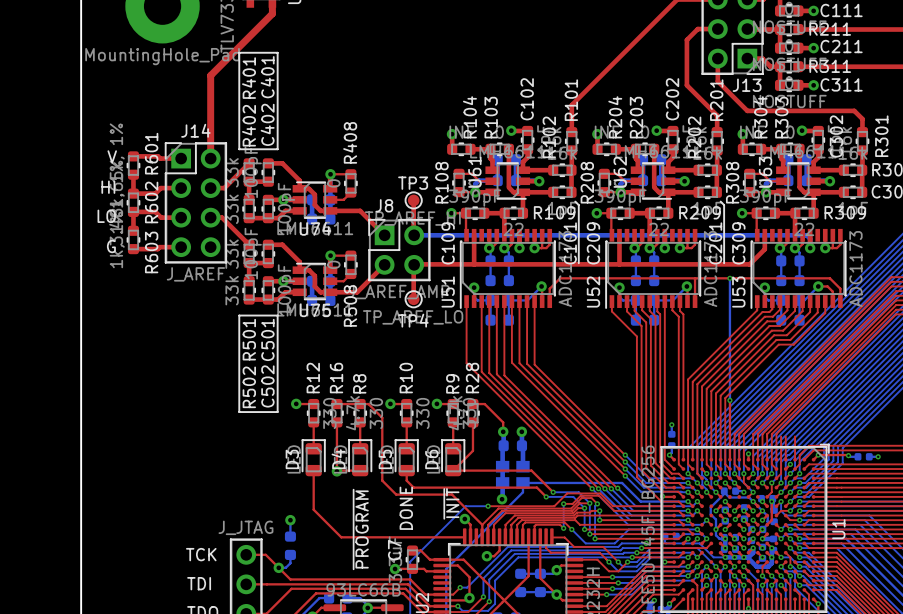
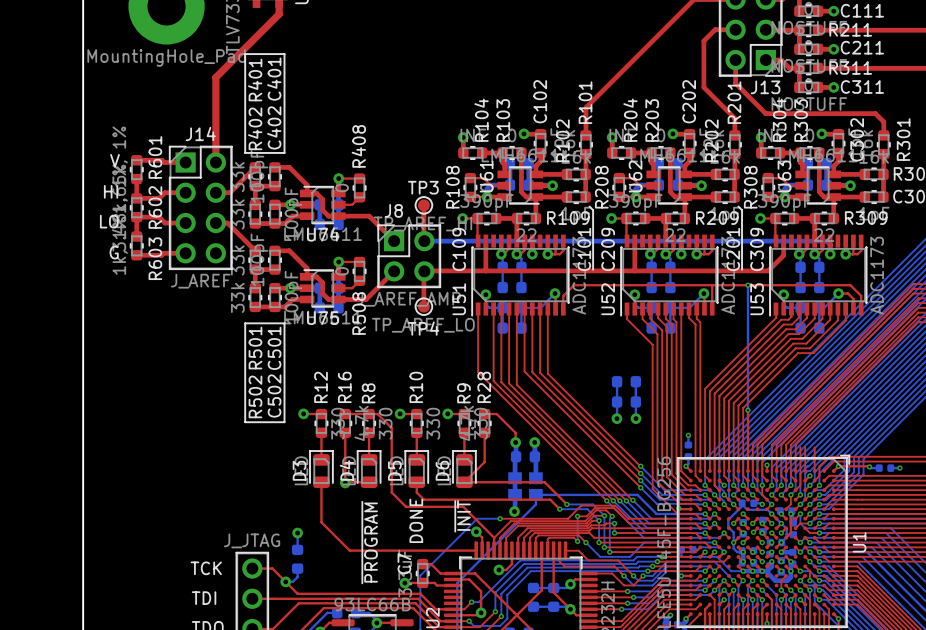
bottom track: none -> (617, 381) (617, 418)
part: none -> (626, 381)
bottom track: none -> (635, 381) (635, 418)
part: none -> (626, 401)
via: none -> (616, 418)
via: none -> (635, 418)

